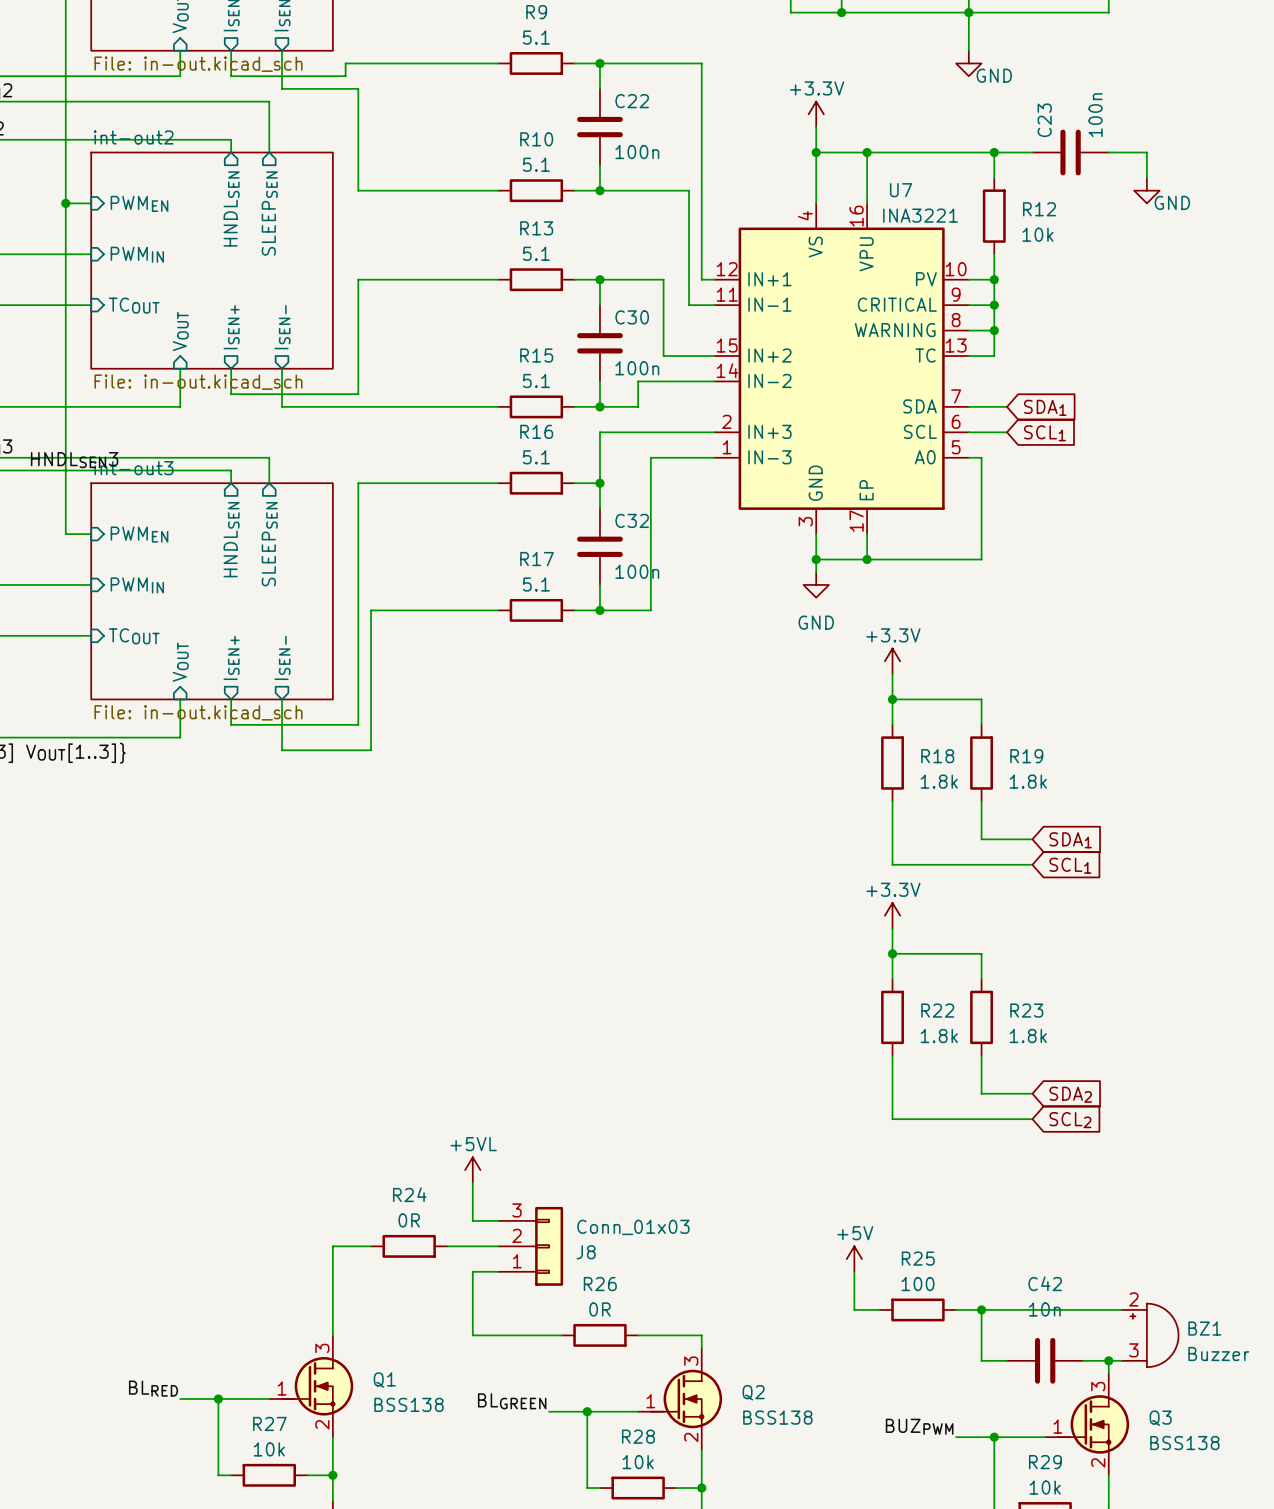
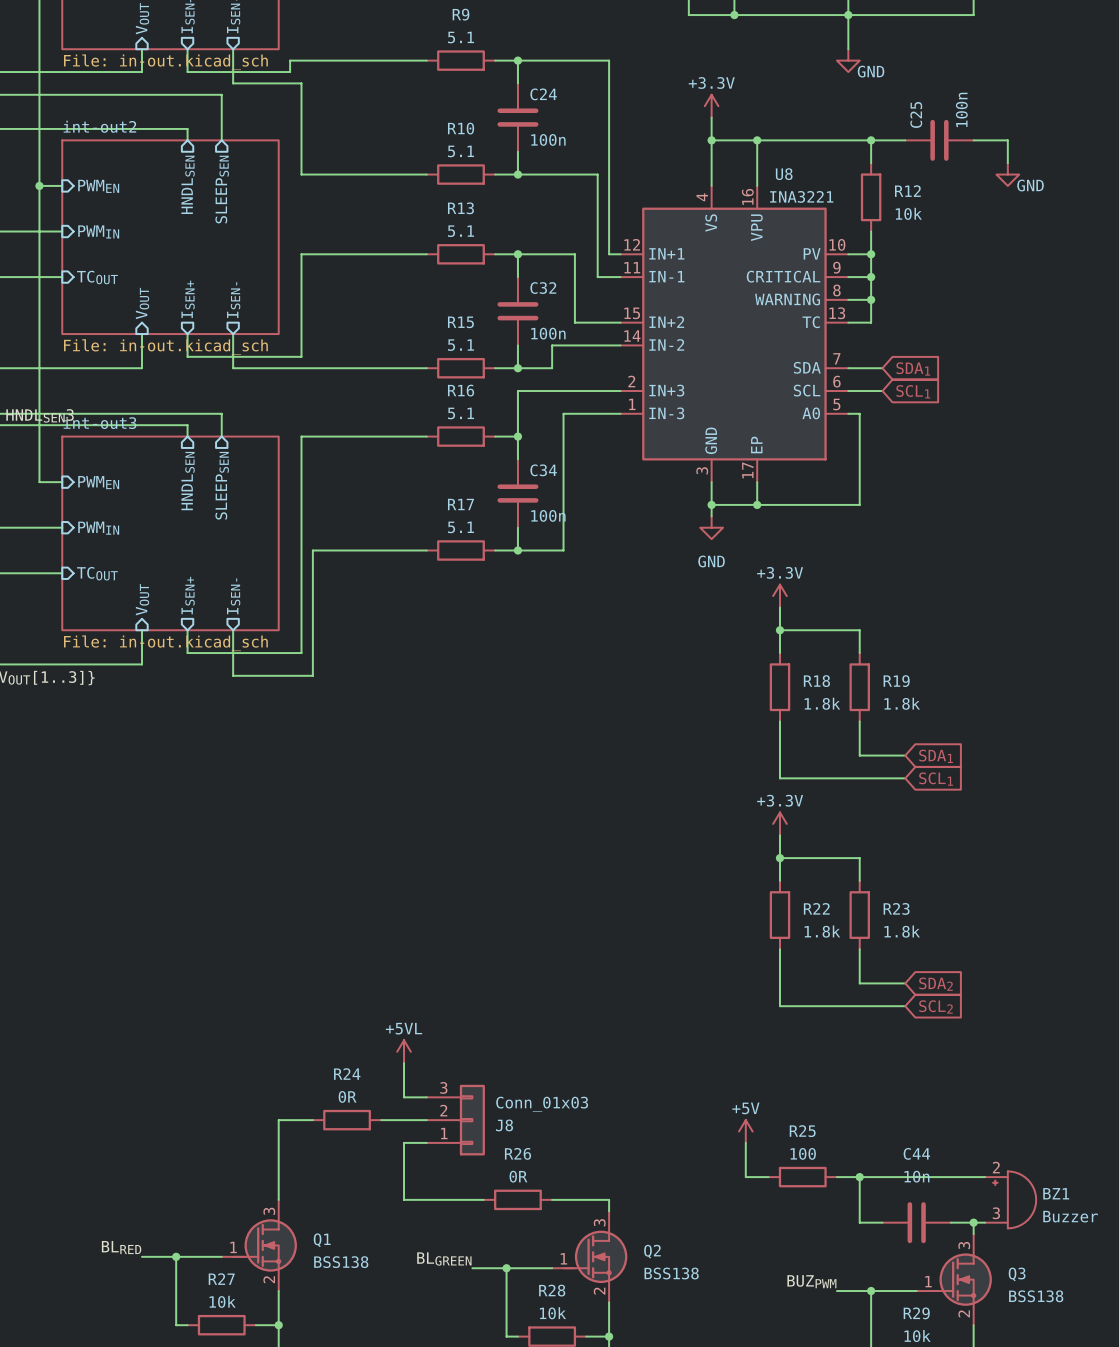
C22 name: C22 (632, 101) -> C24 (543, 94)
C23 name: C23 (1044, 120) -> C25 (916, 114)
U7 name: U7 (901, 190) -> U8 (784, 174)
C30 name: C30 (632, 317) -> C32 (543, 288)
C32 name: C32 (632, 520) -> C34 (543, 470)
C42 name: C42 (1045, 1283) -> C44 (916, 1153)

